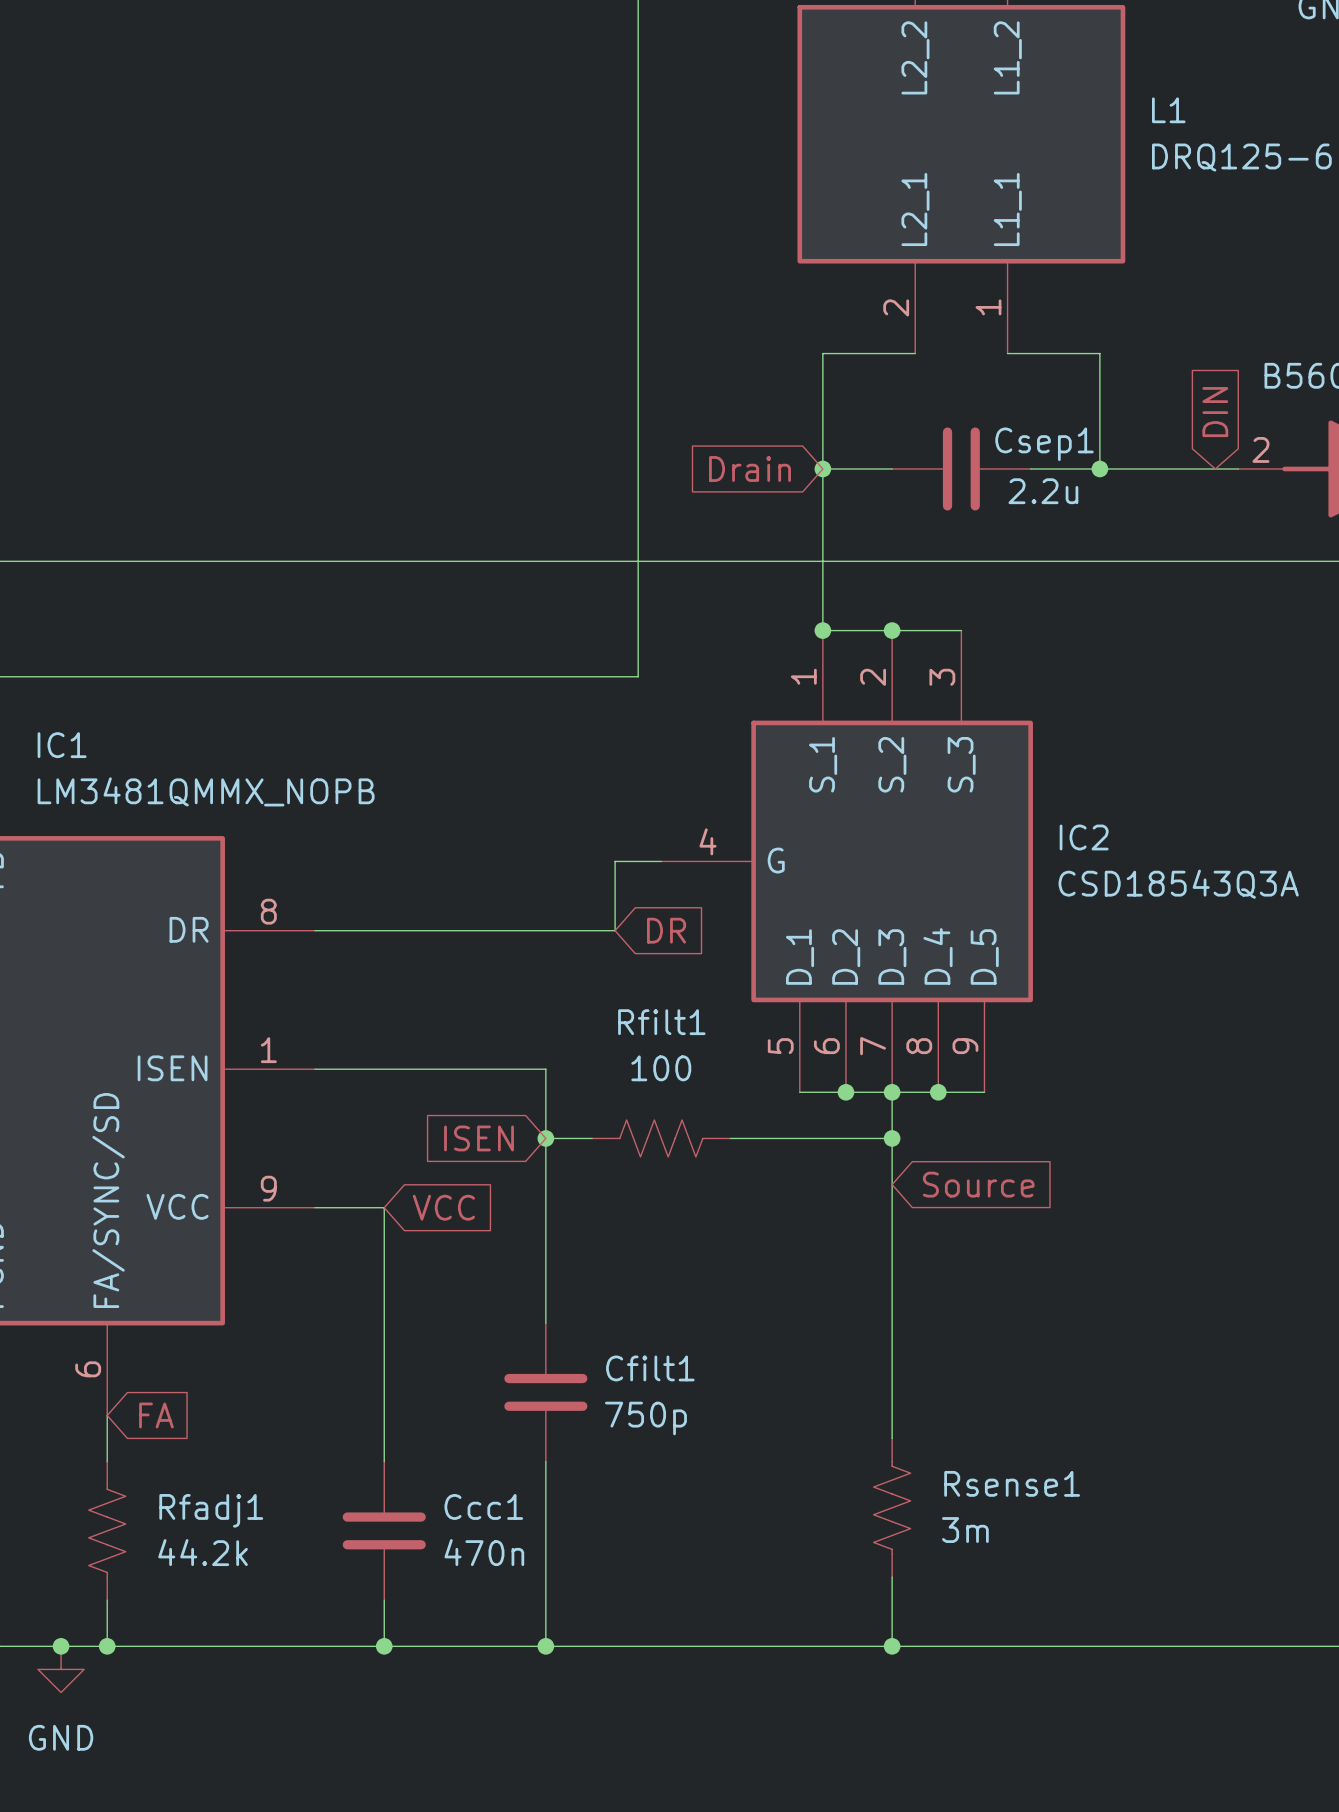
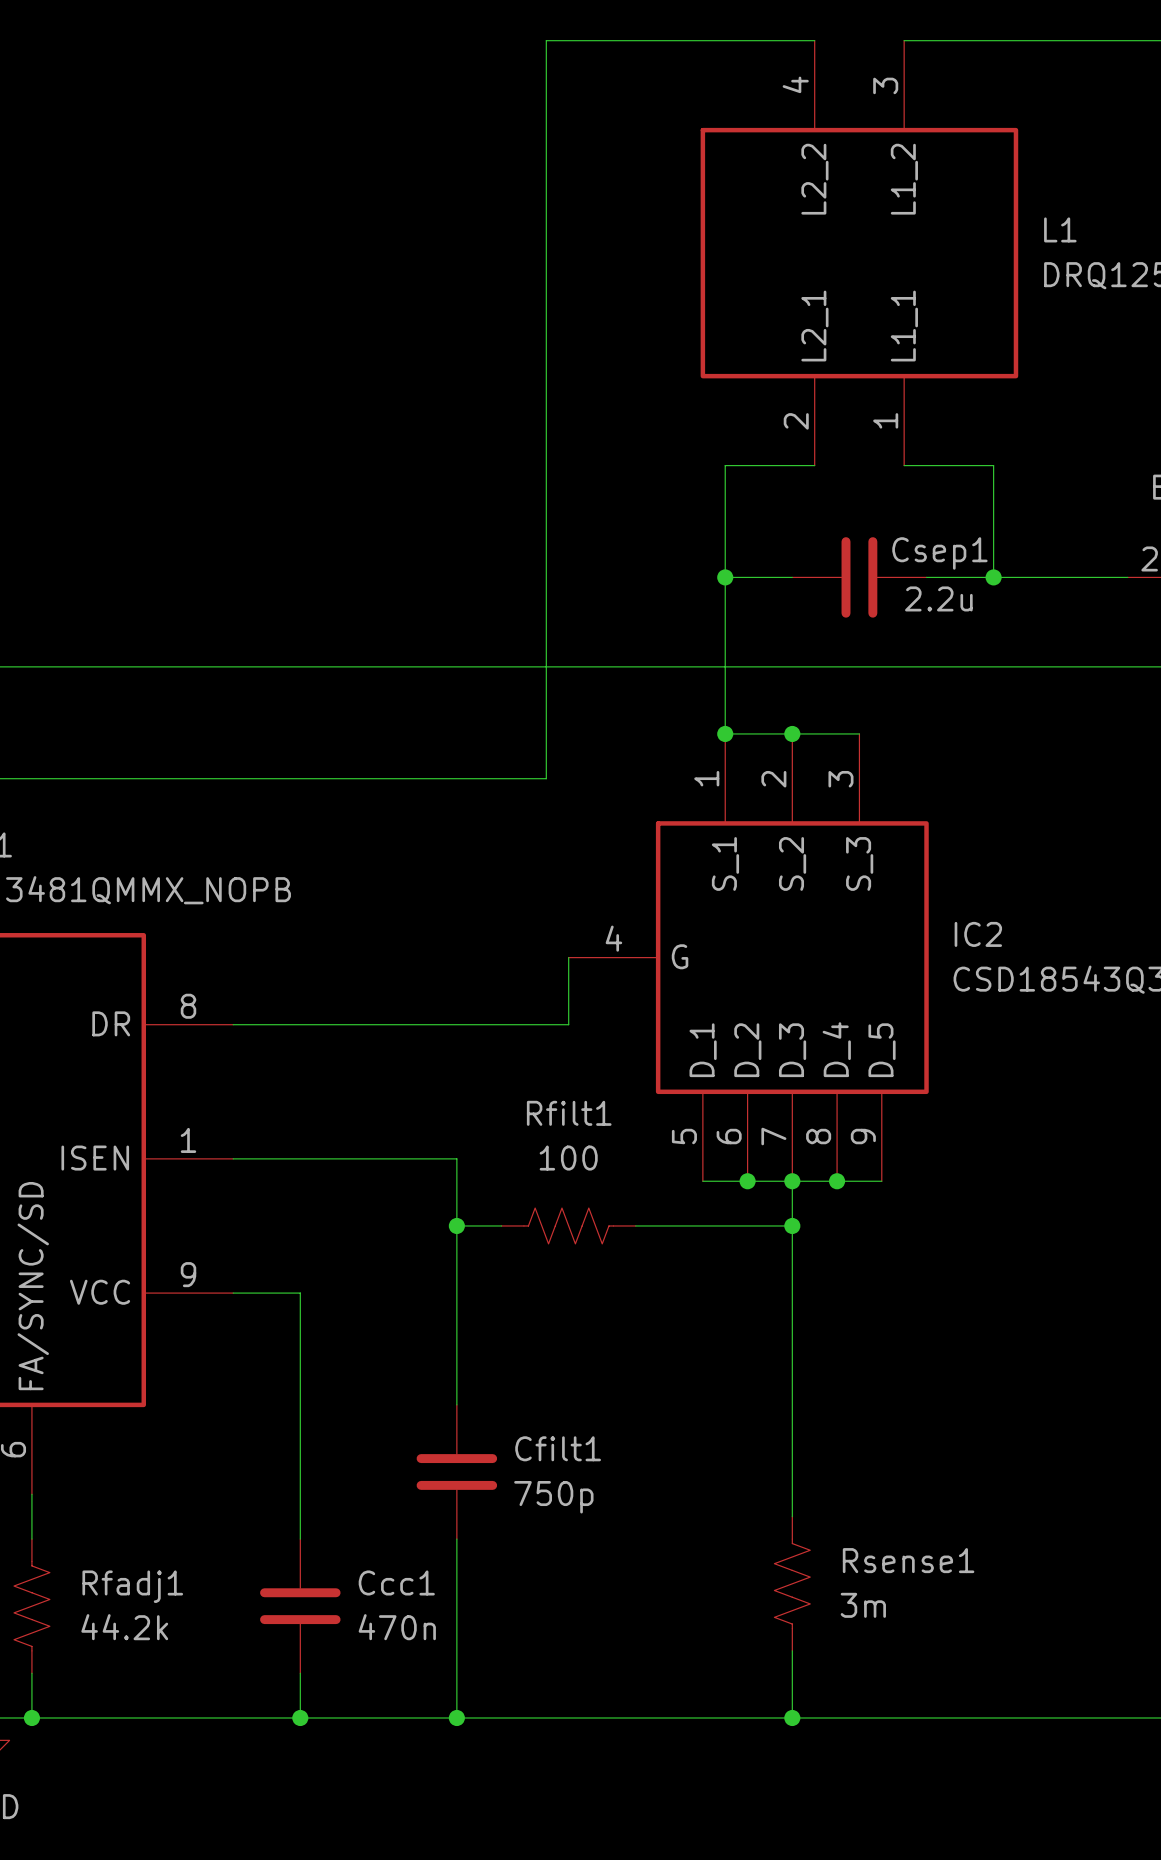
global label: DIN (1215, 412) -> none
global label: Drain (750, 468) -> none
wire: (661, 861) (615, 861) (615, 930) -> (568, 957) (568, 1024) (523, 1024)
global label: DR (666, 930) -> none
global label: ISEN (479, 1138) -> none
global label: Source (978, 1184) -> none
global label: VCC (443, 1207) -> none
global label: FA (156, 1415) -> none

